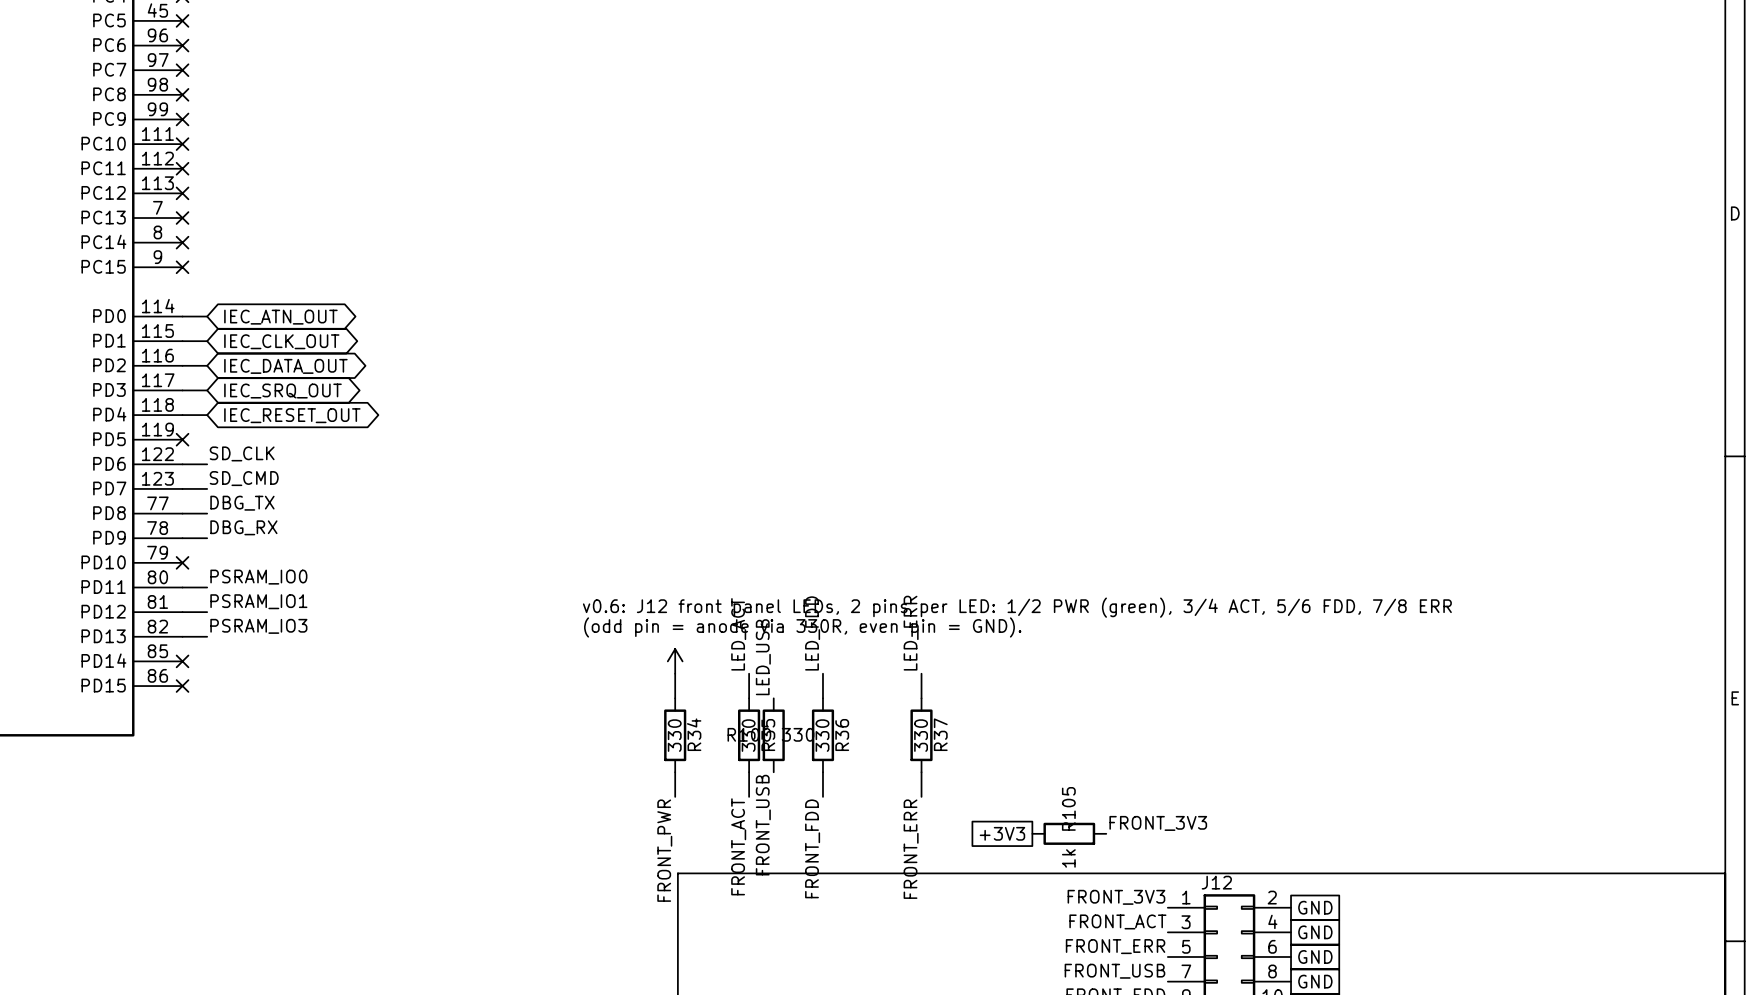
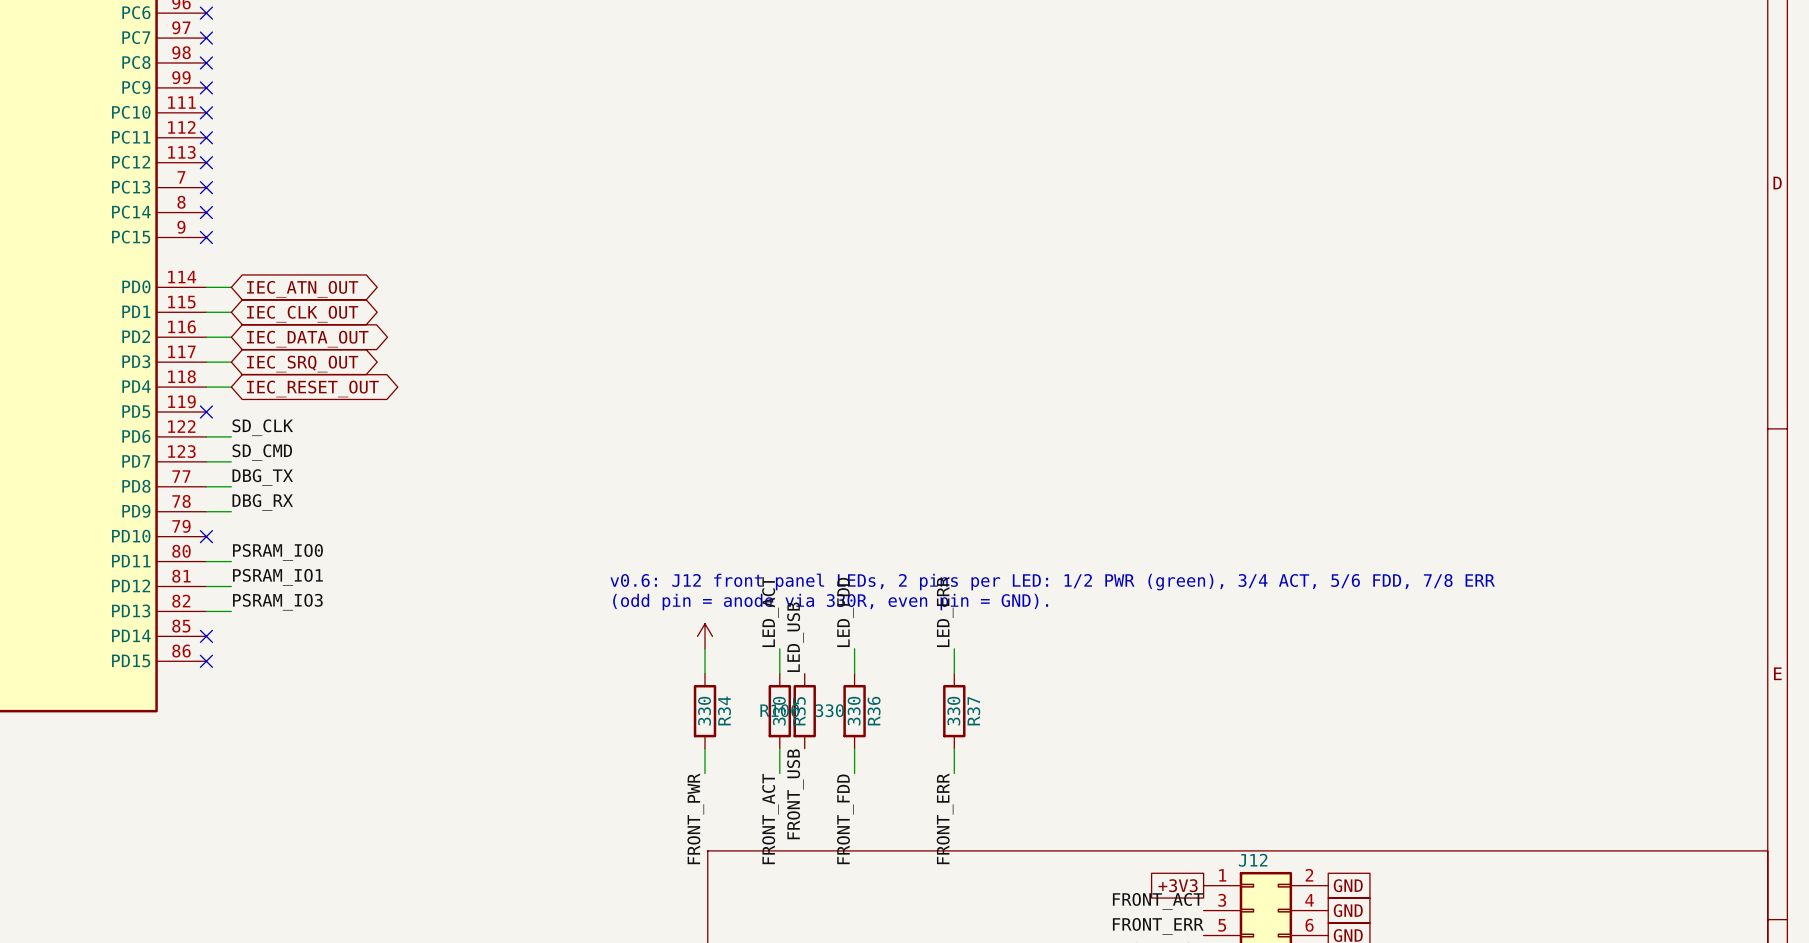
label: FRONT_3V3 (1158, 823) -> none
global label position: +3V3 (1002, 833) -> +3V3 (1178, 885)
R105: 1k (1069, 833) -> none
label: FRONT_3V3 (1116, 897) -> none

